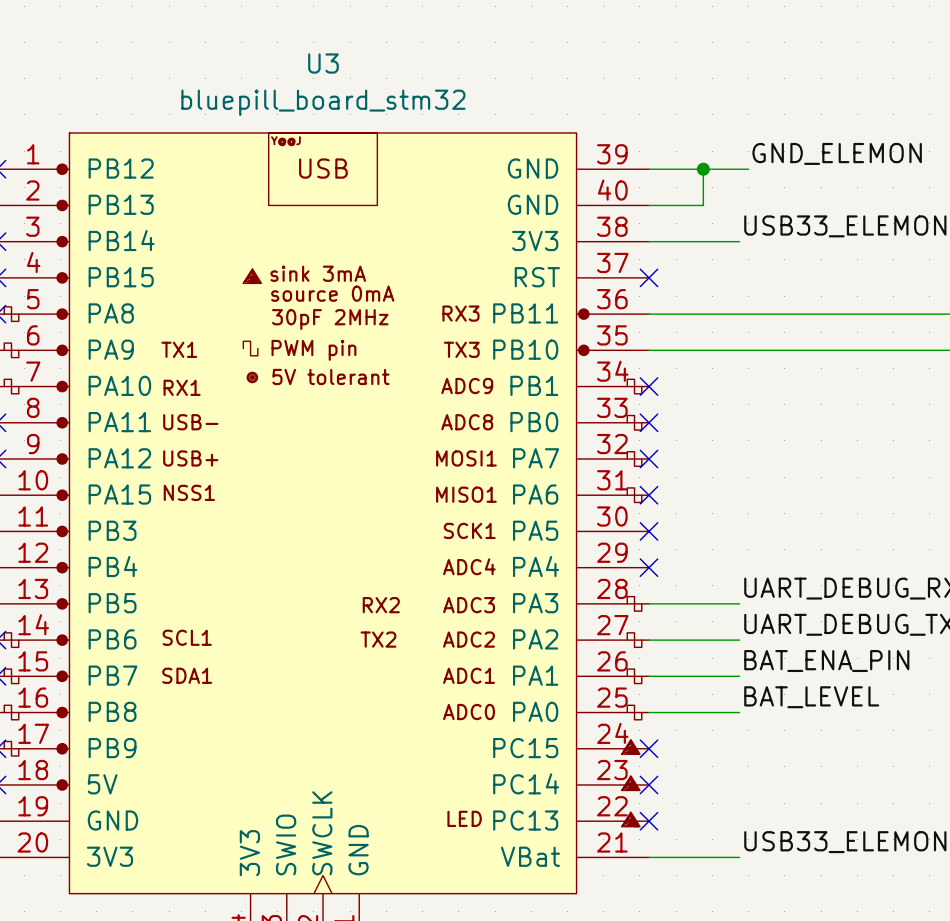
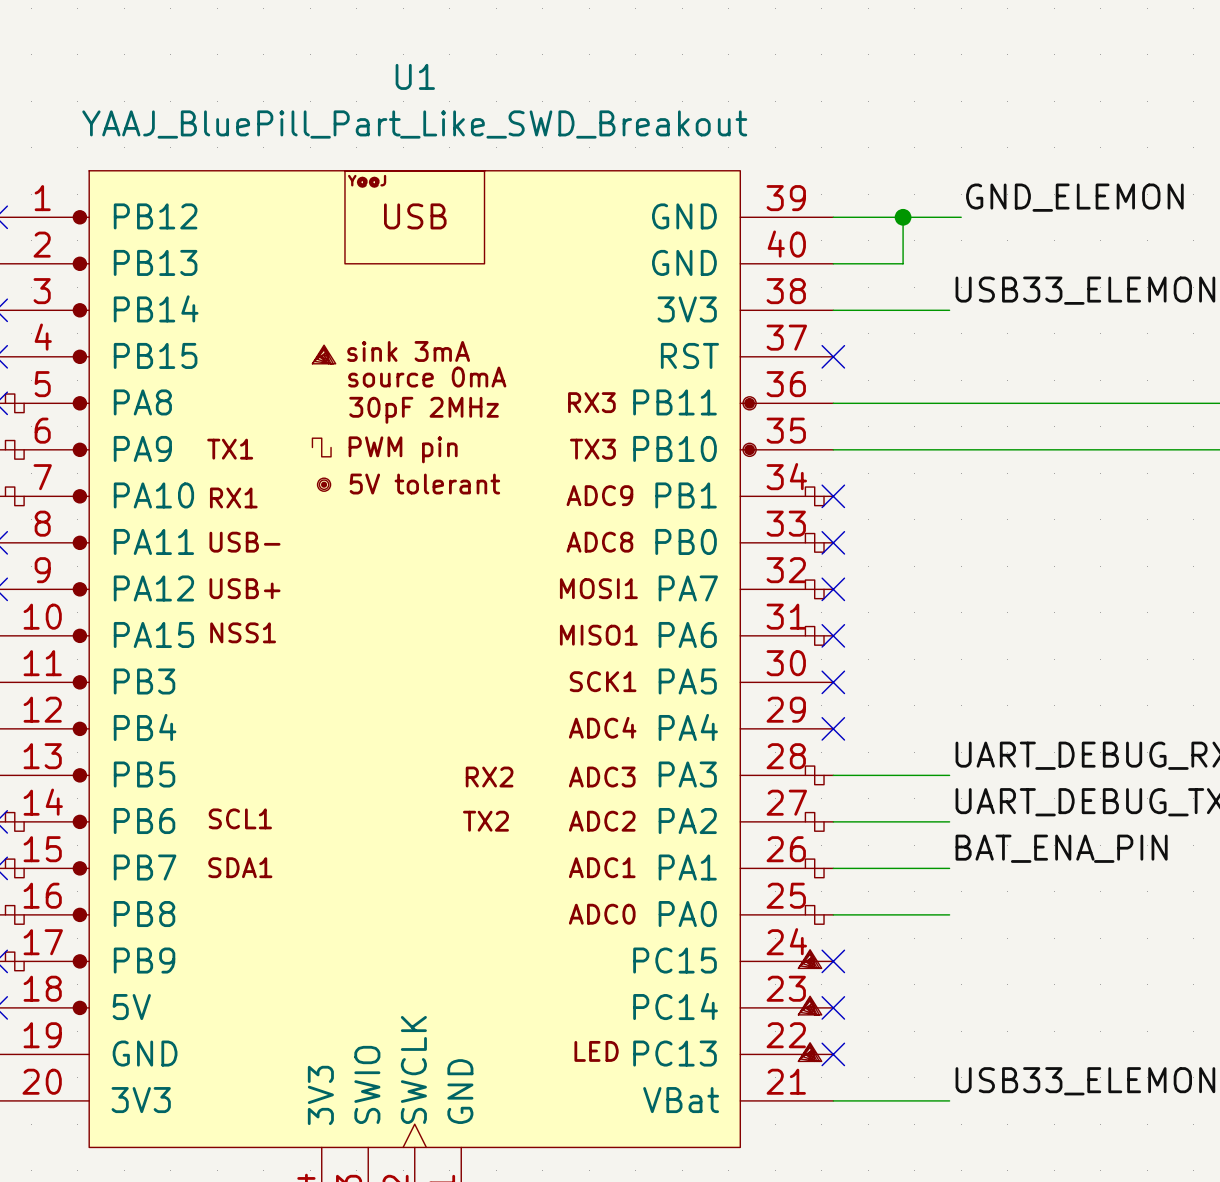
U3 name: U3 (323, 63) -> U1 (415, 76)
U3 value: bluepill_board_stm32 (323, 102) -> YAAJ_BluePill_Part_Like_SWD_Breakout (414, 124)
label: BAT_LEVEL (811, 697) -> none

